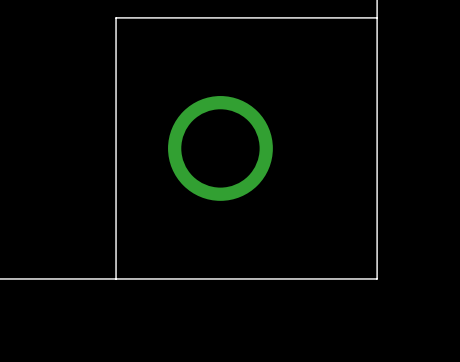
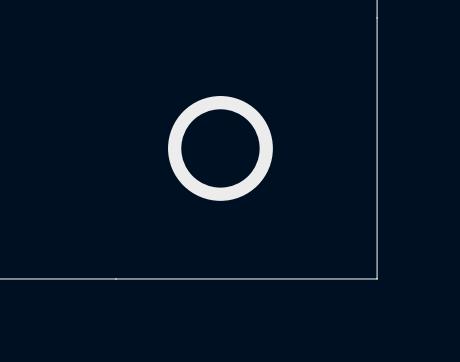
board edge: (377, 17) (116, 17) (116, 278) -> none

